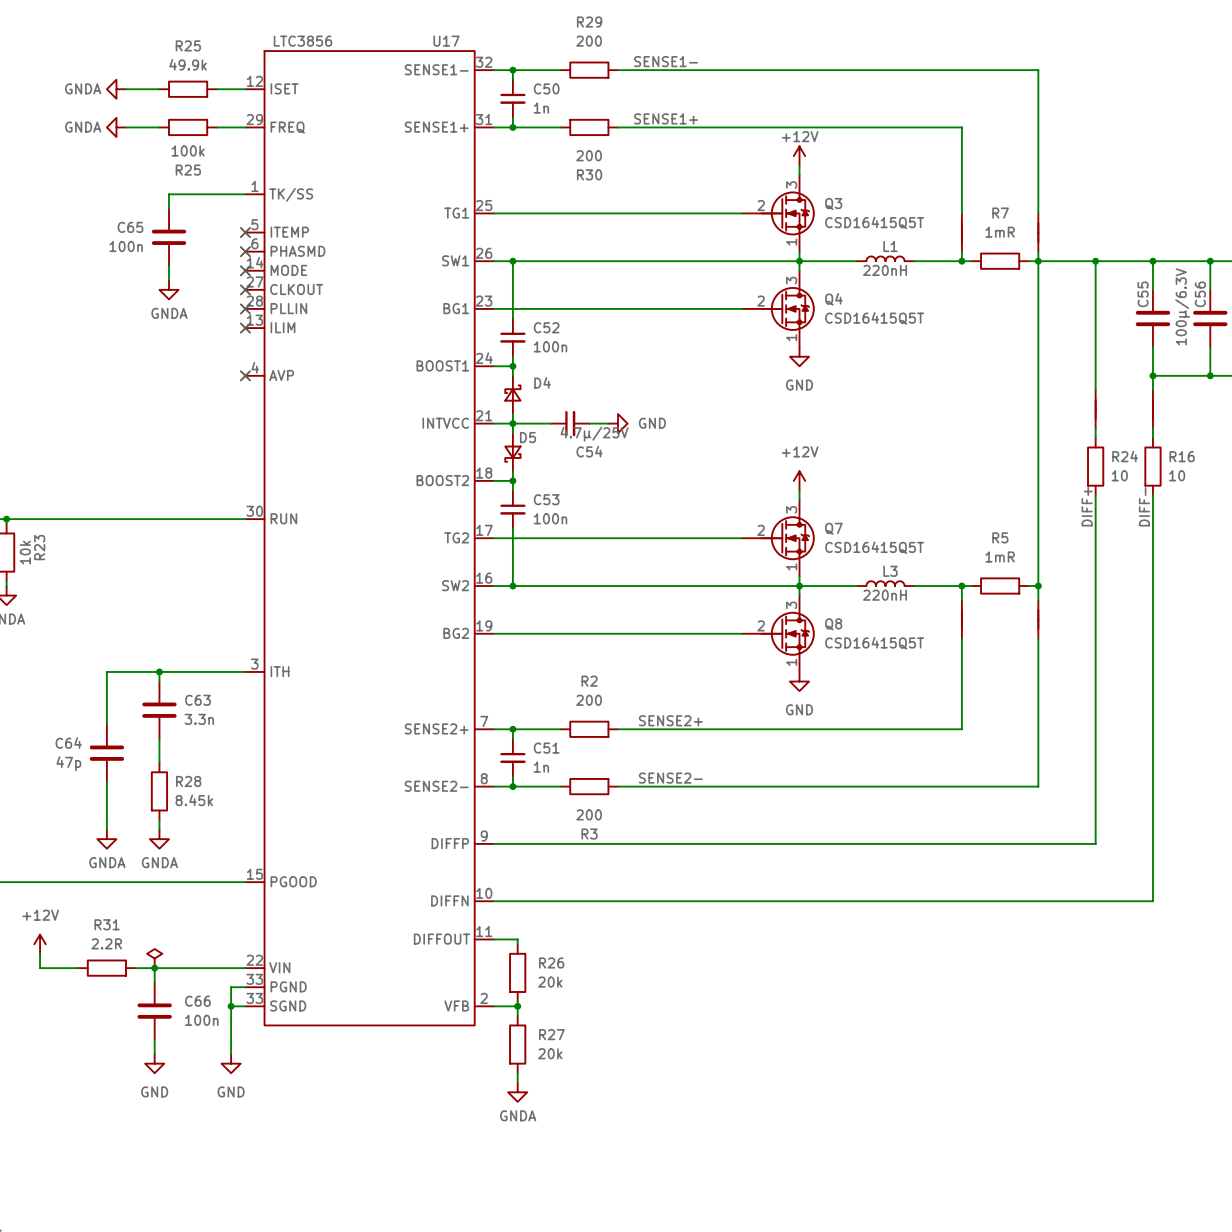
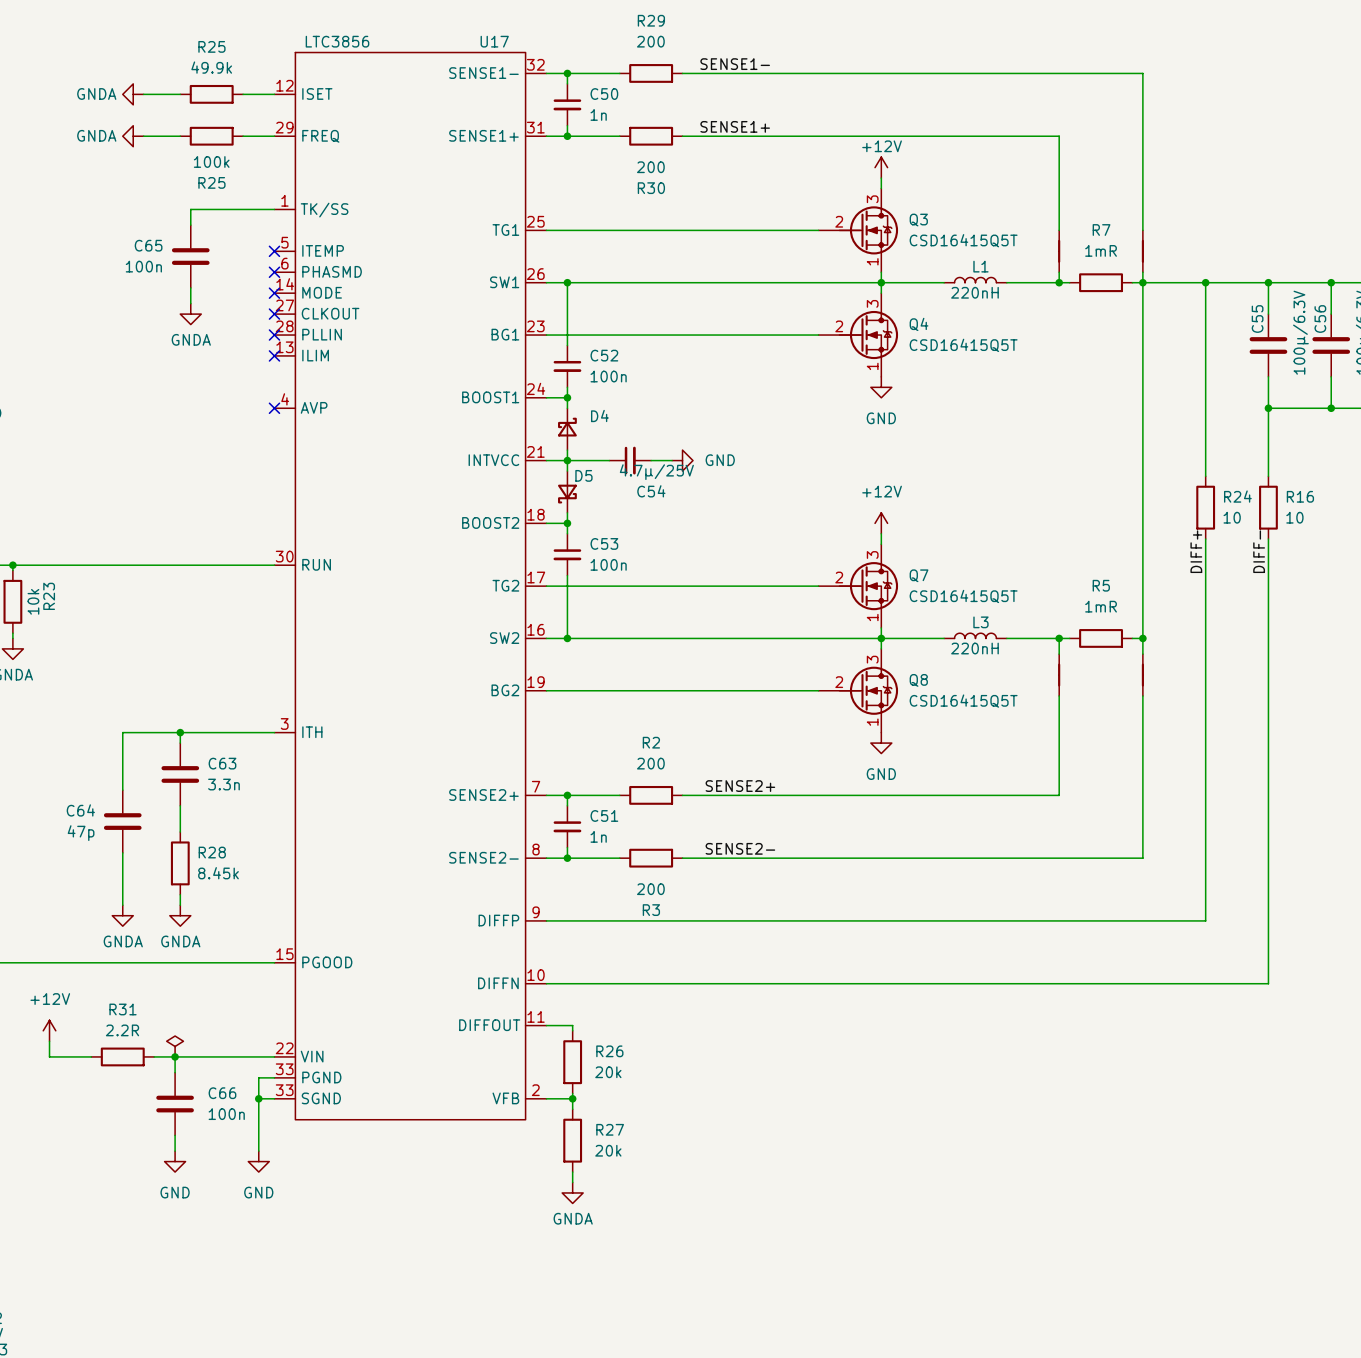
part: (1095, 409) -> none
part: (1152, 409) -> none

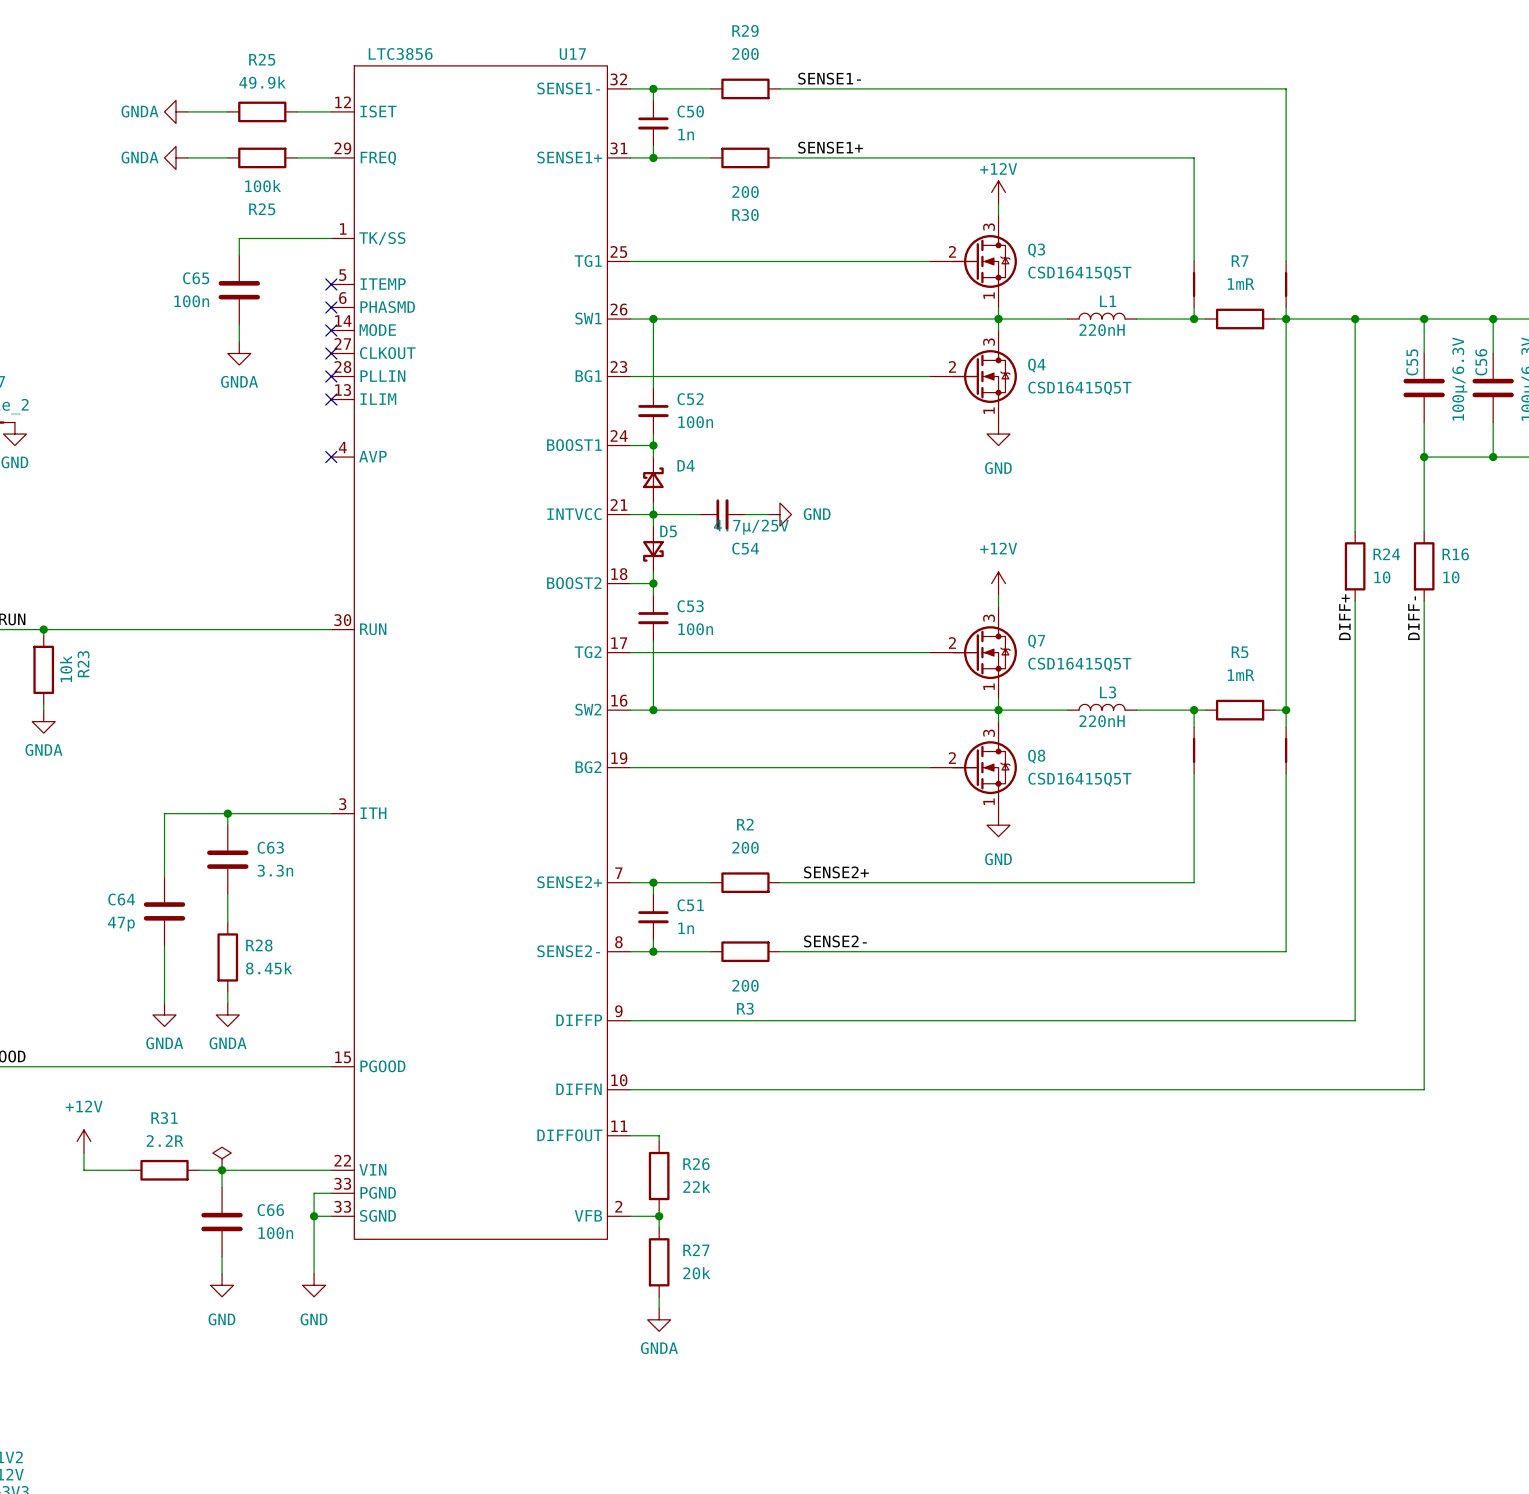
R26 value: 20k (608, 1072) -> 22k (696, 1186)

